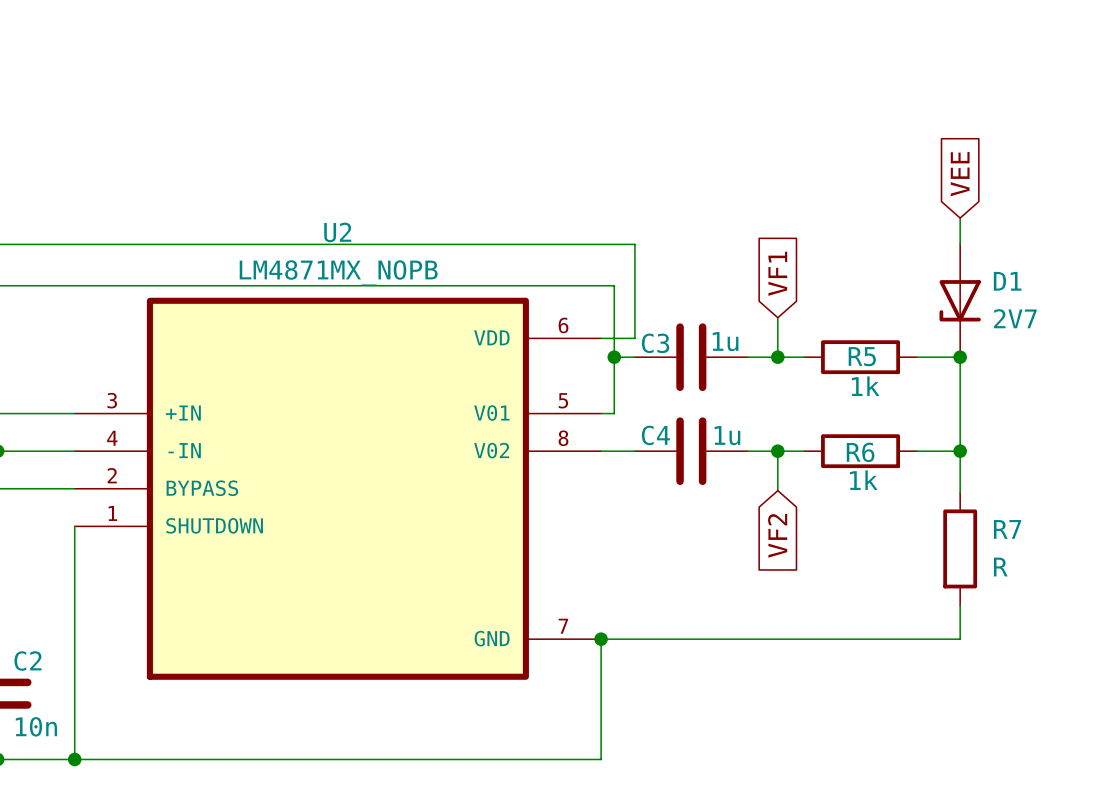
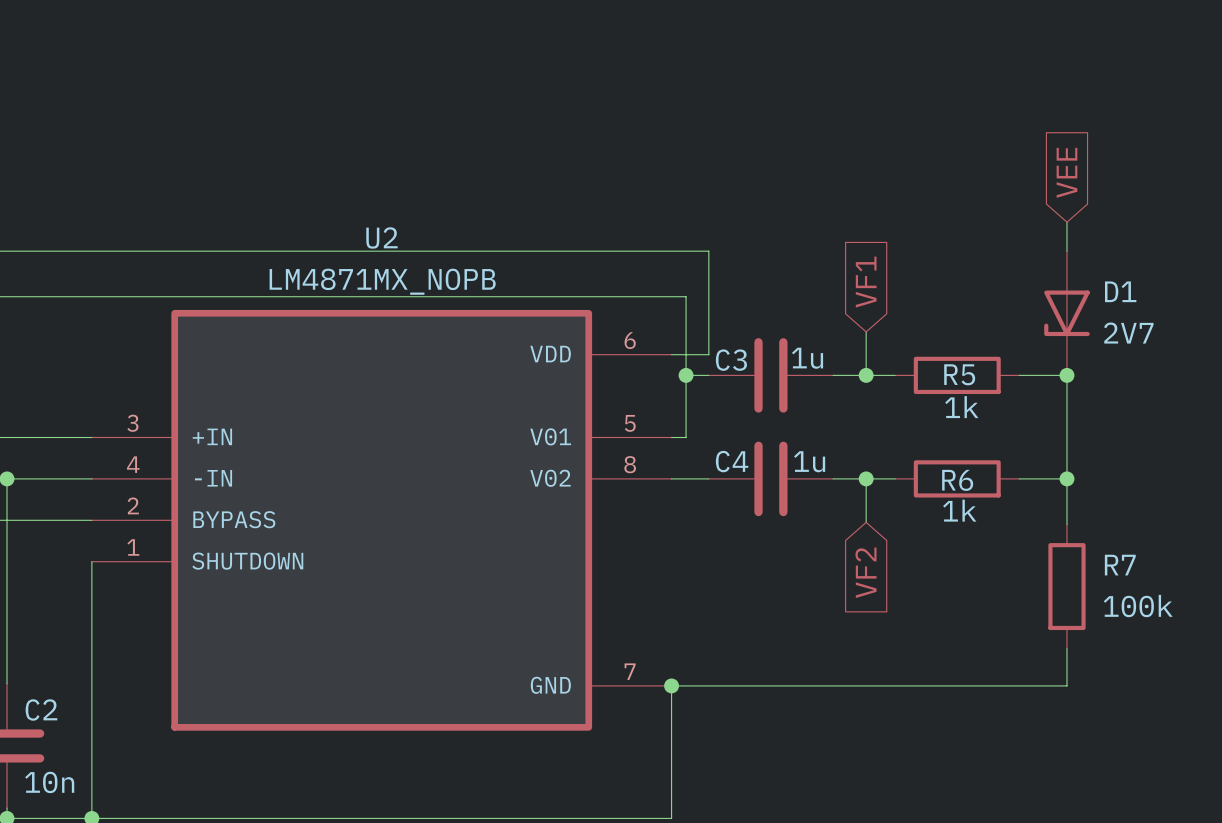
R7 value: R (1000, 567) -> 100k (1138, 606)

